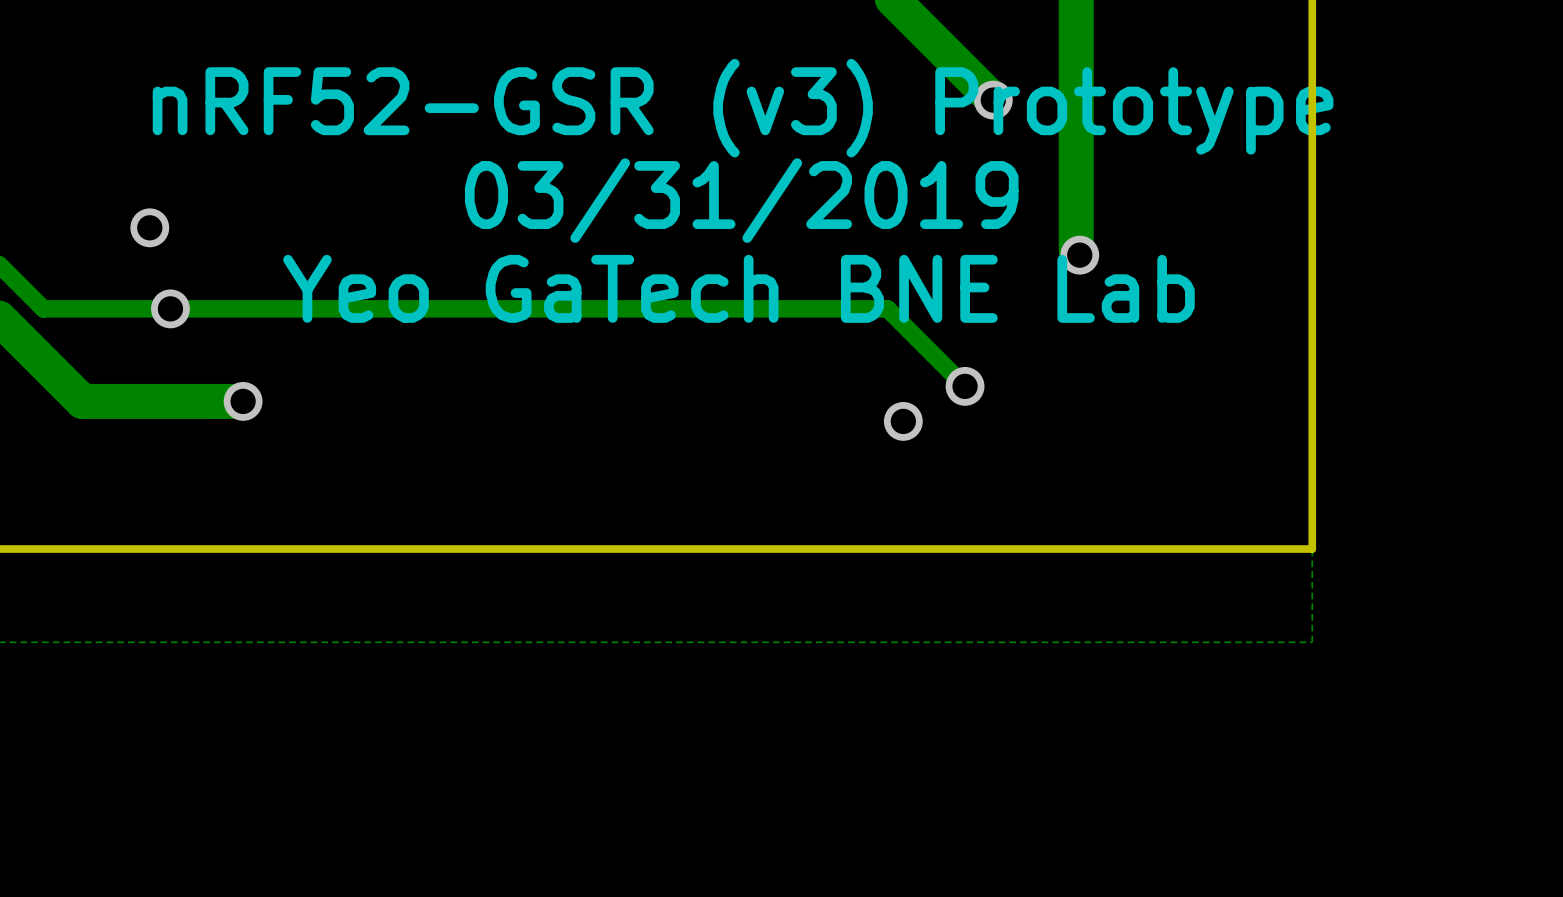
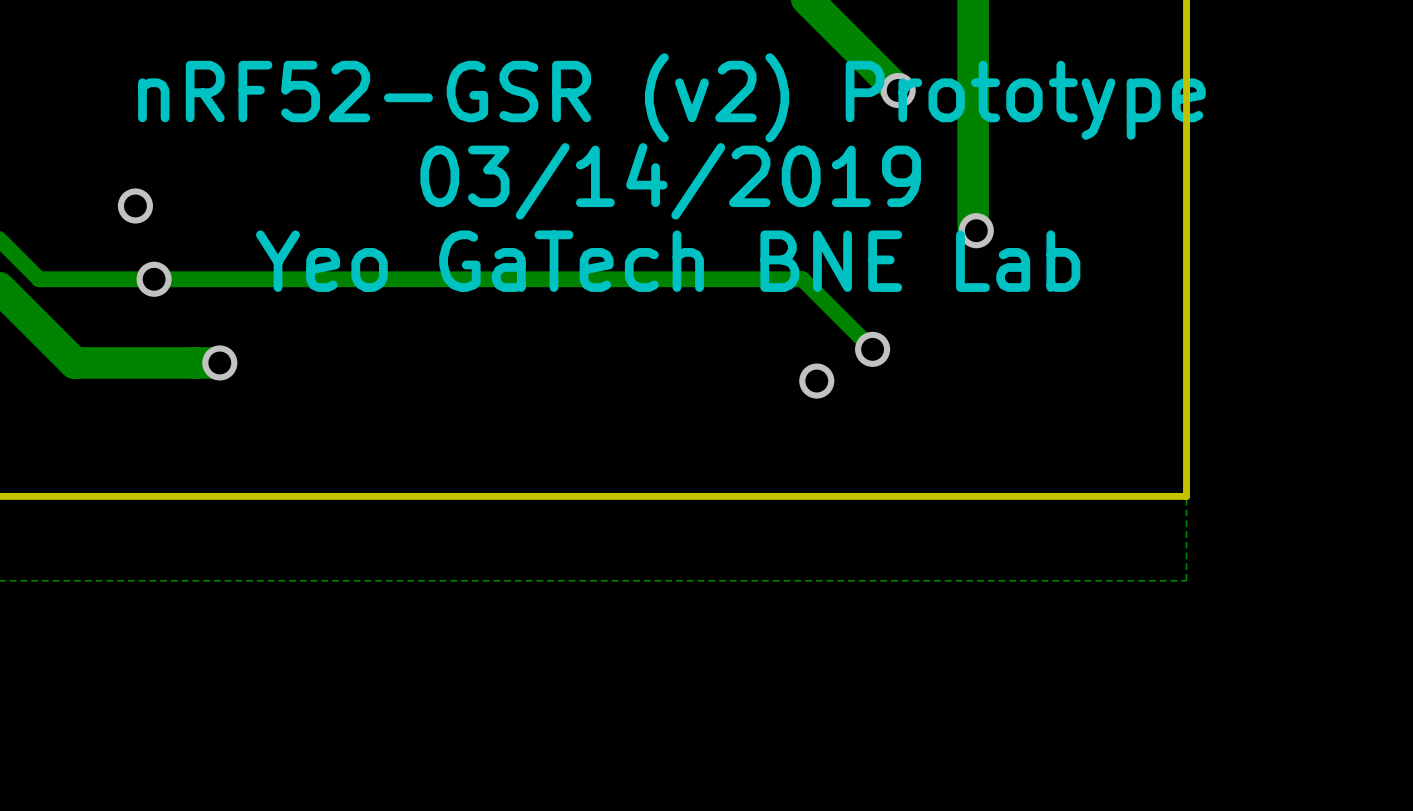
text: nRF52-GSR (v3) Prototype (743, 108) -> nRF52-GSR (v2) Prototype (671, 97)
text: 03/31/2019 (741, 200) -> 03/14/2019 (670, 181)

